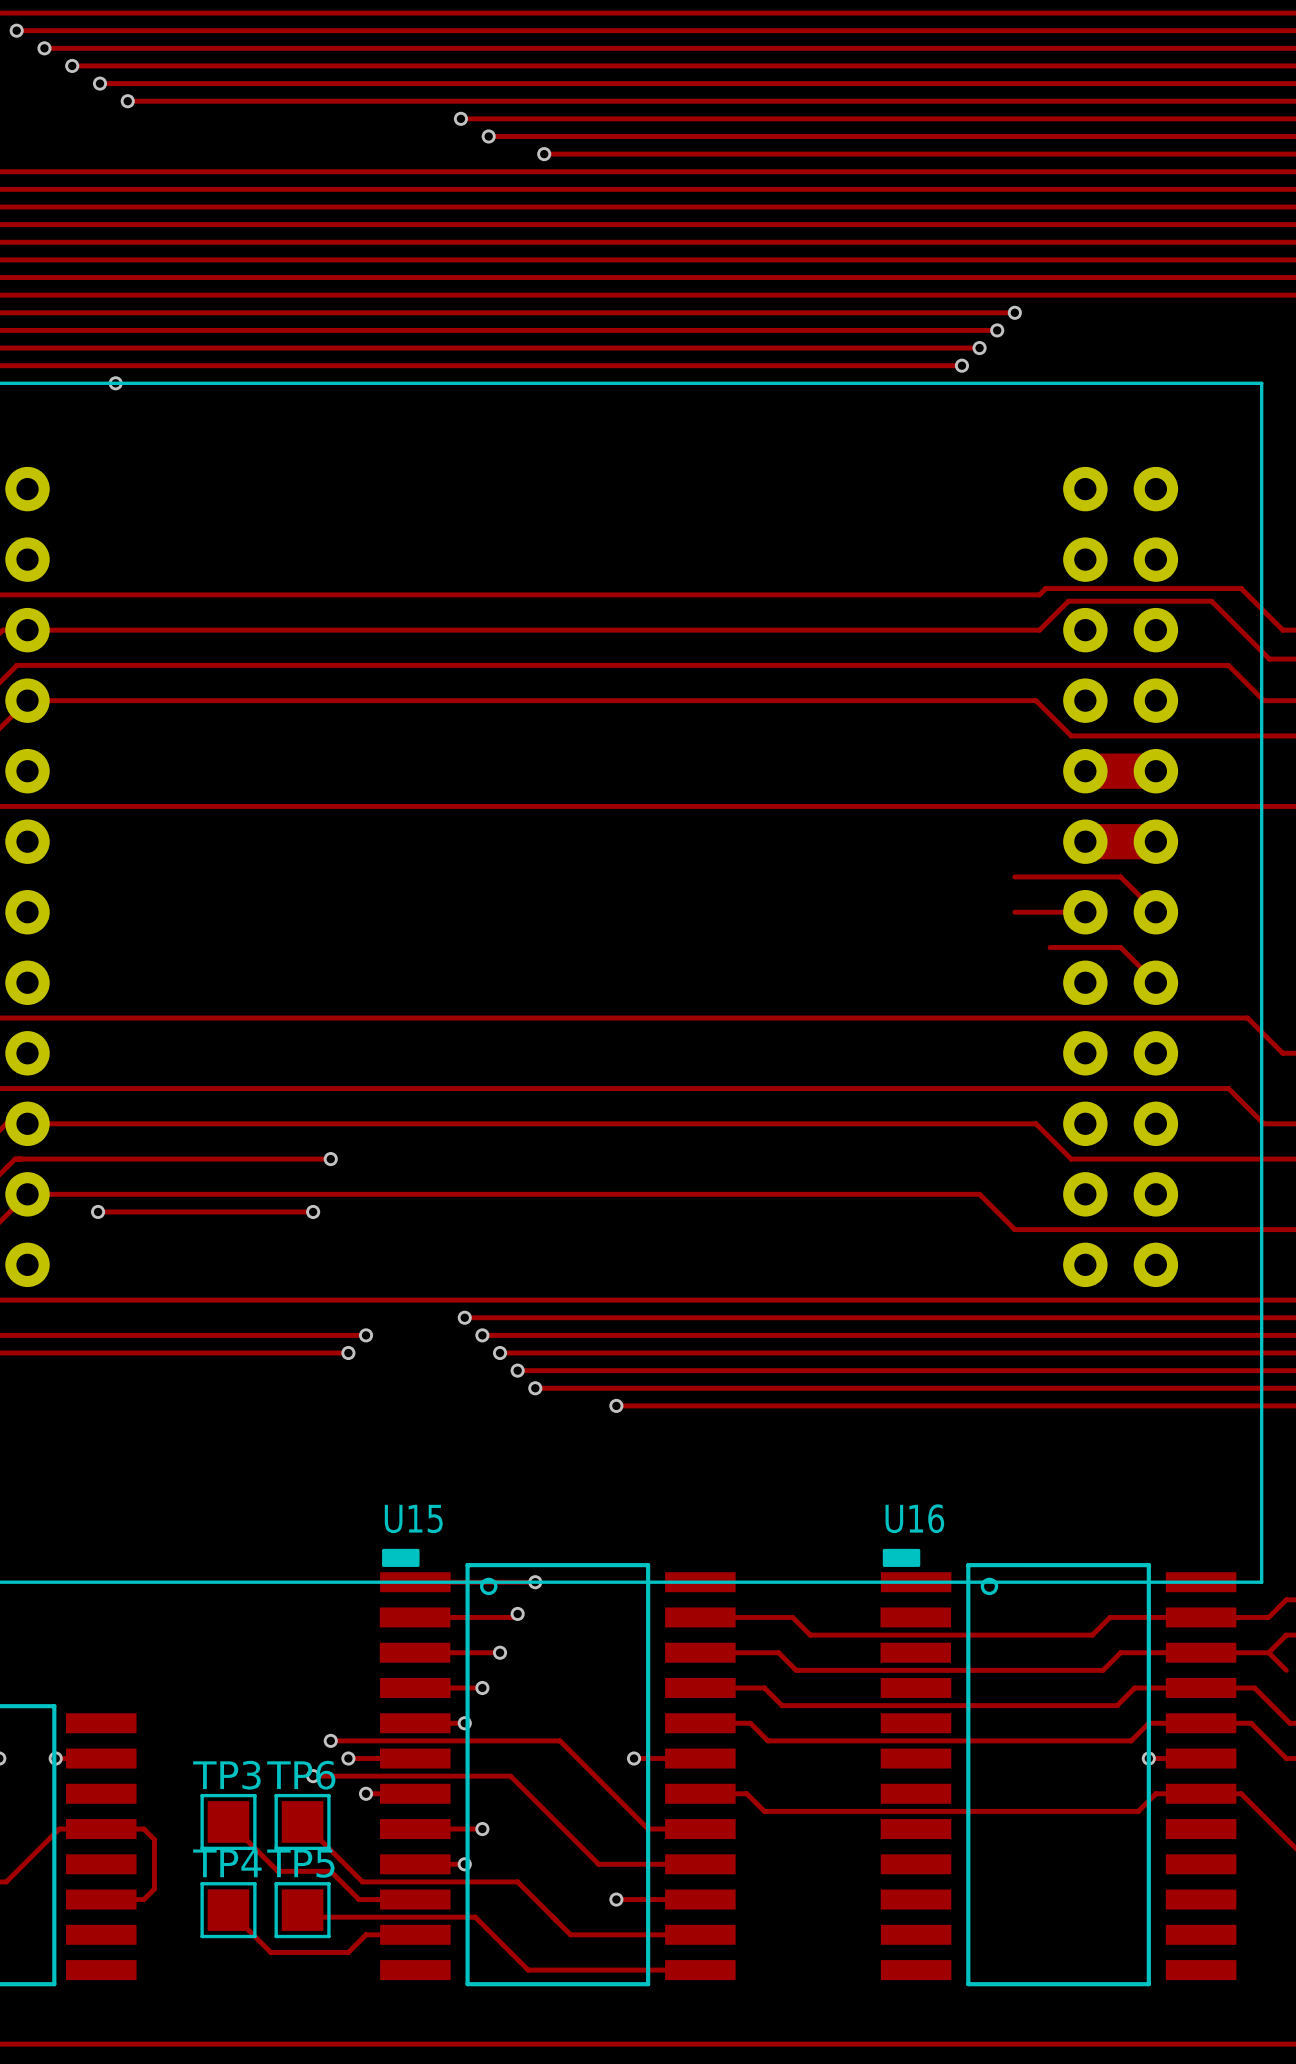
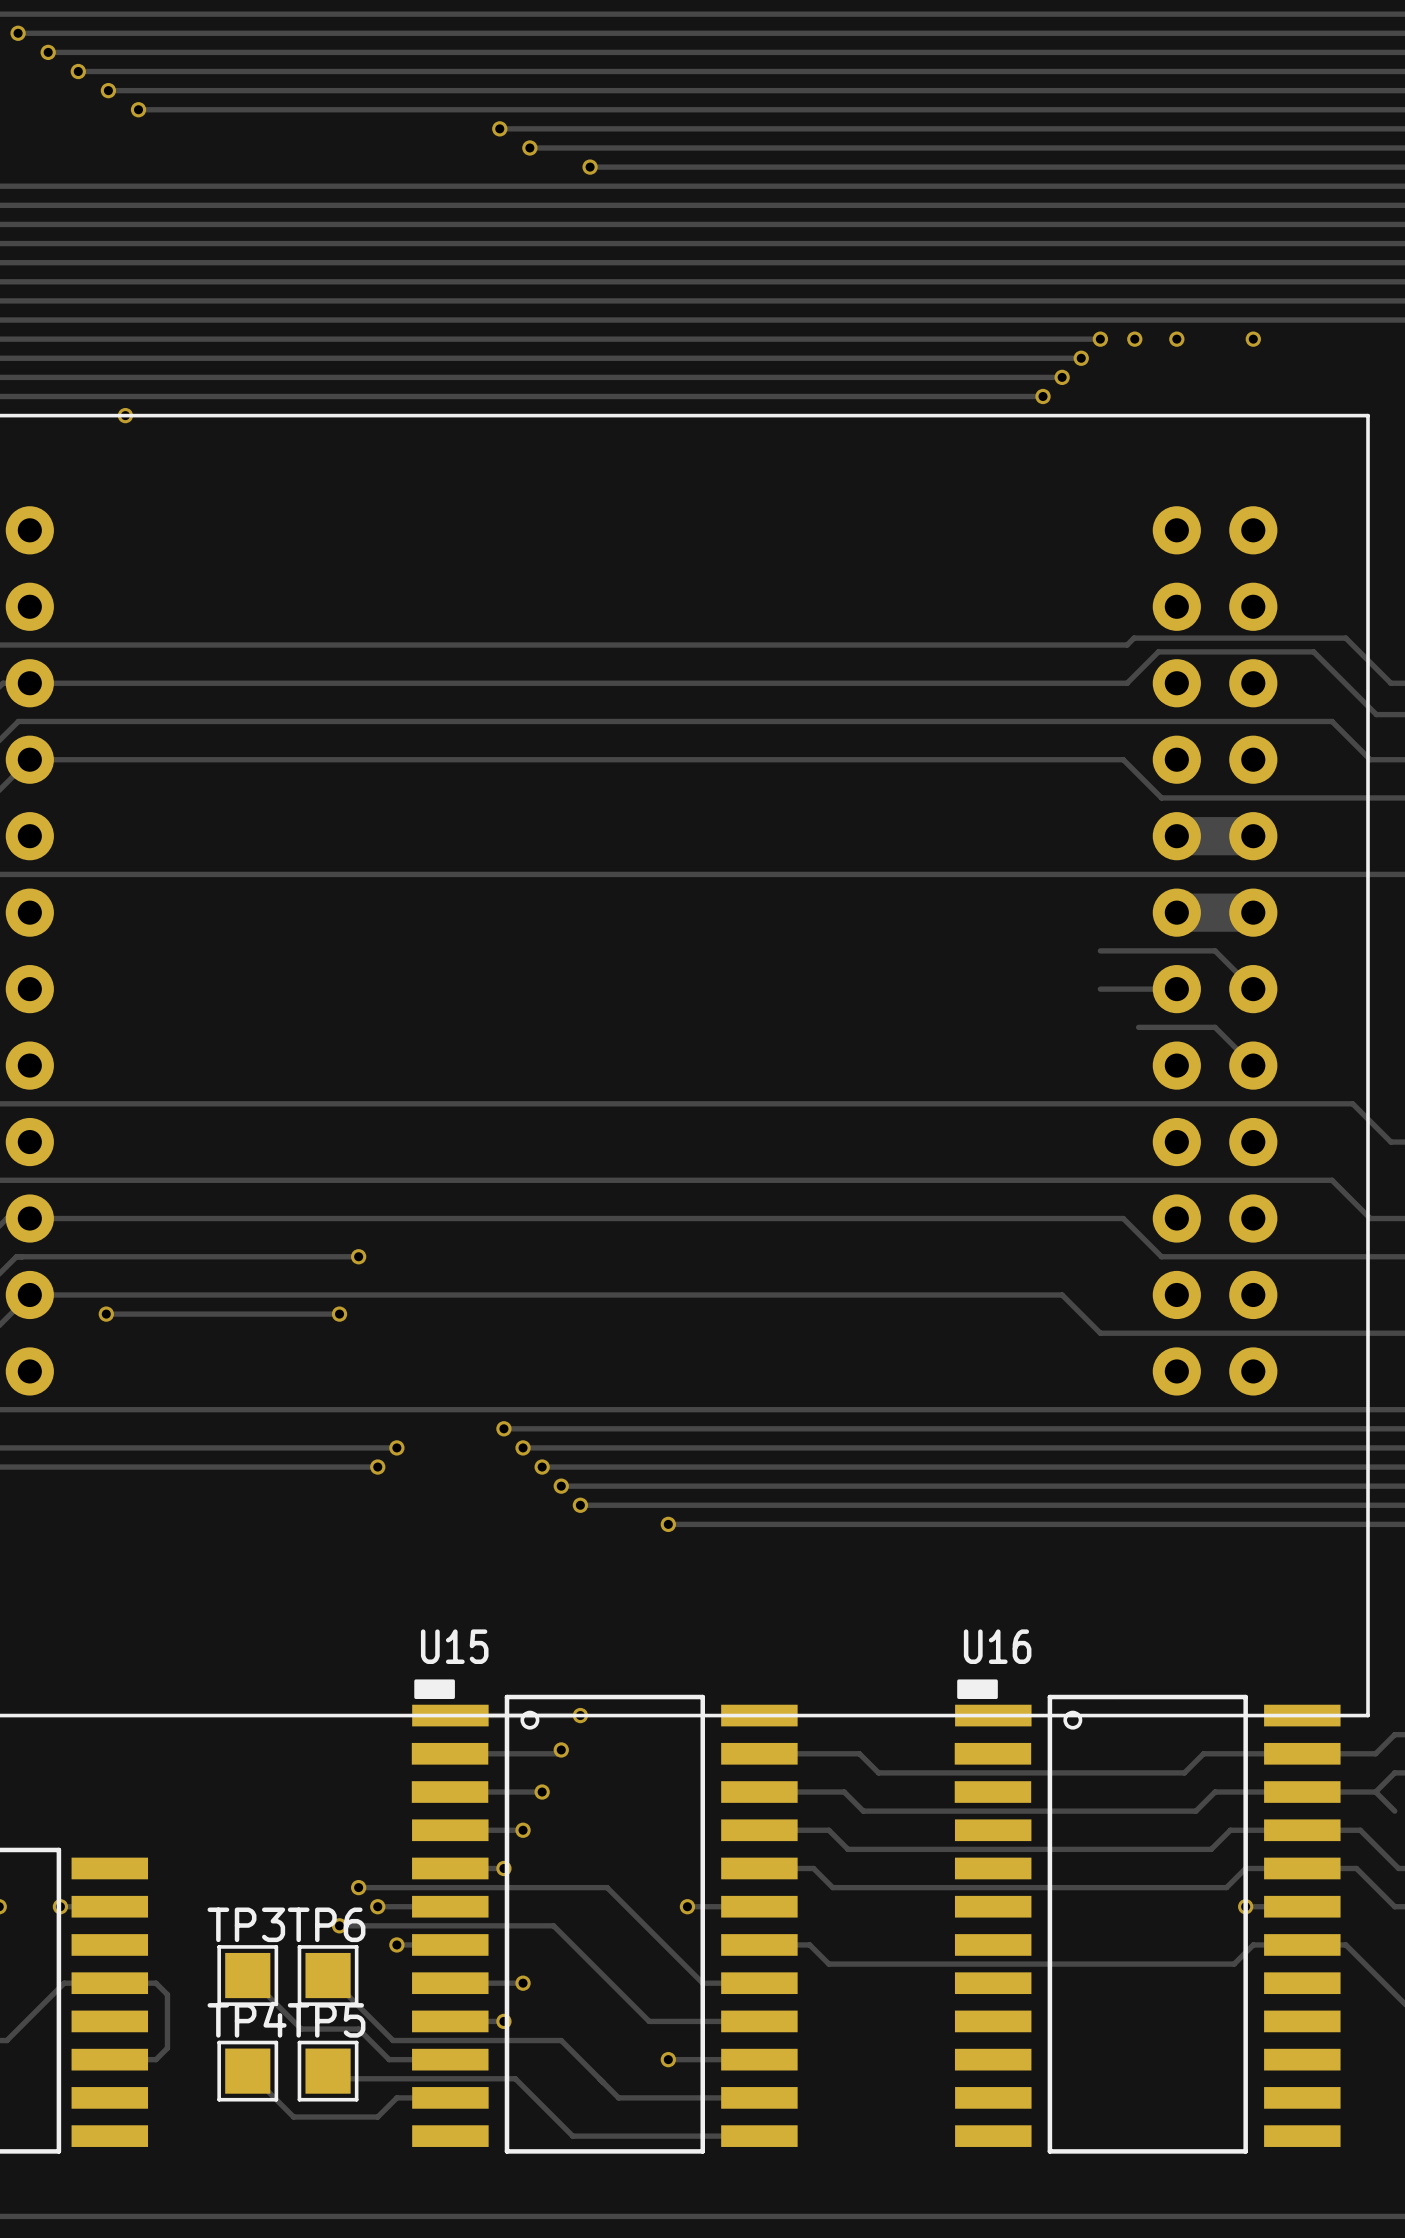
via: none -> (1134, 339)
via: none -> (1176, 339)
via: none -> (1253, 339)

